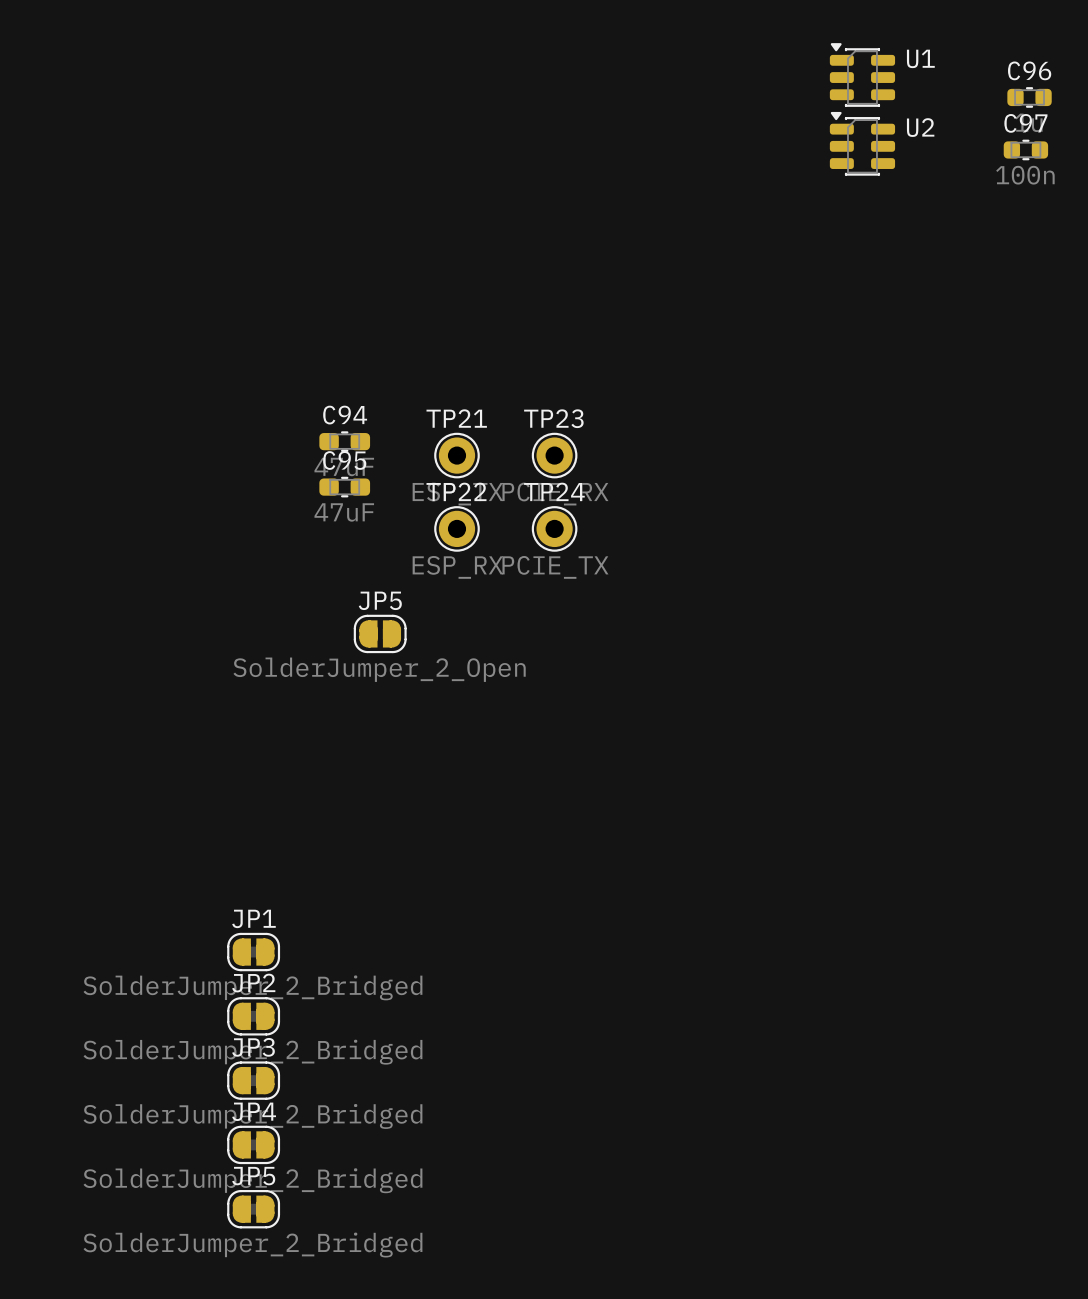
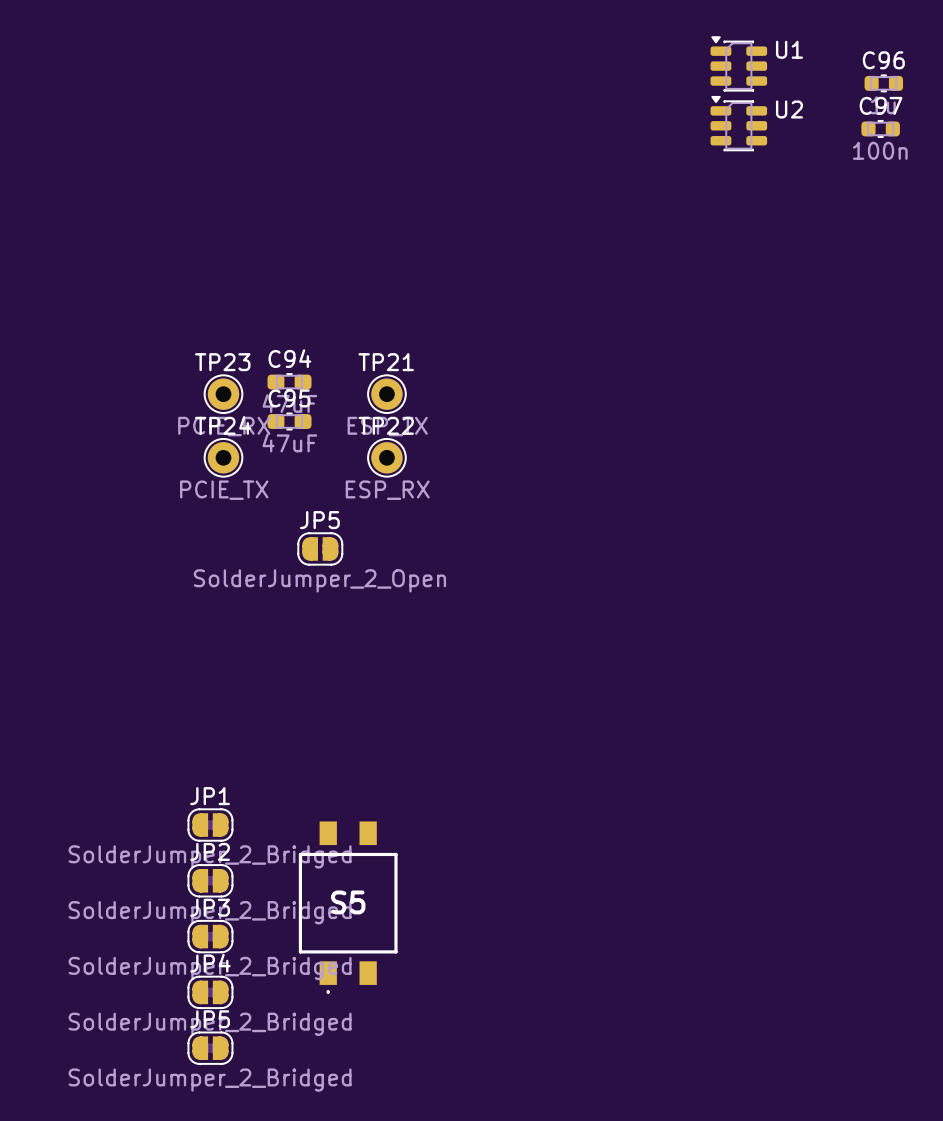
TP23 position: (554, 455) -> (223, 394)
TP24 position: (554, 528) -> (223, 457)
S5: none -> (348, 907)

